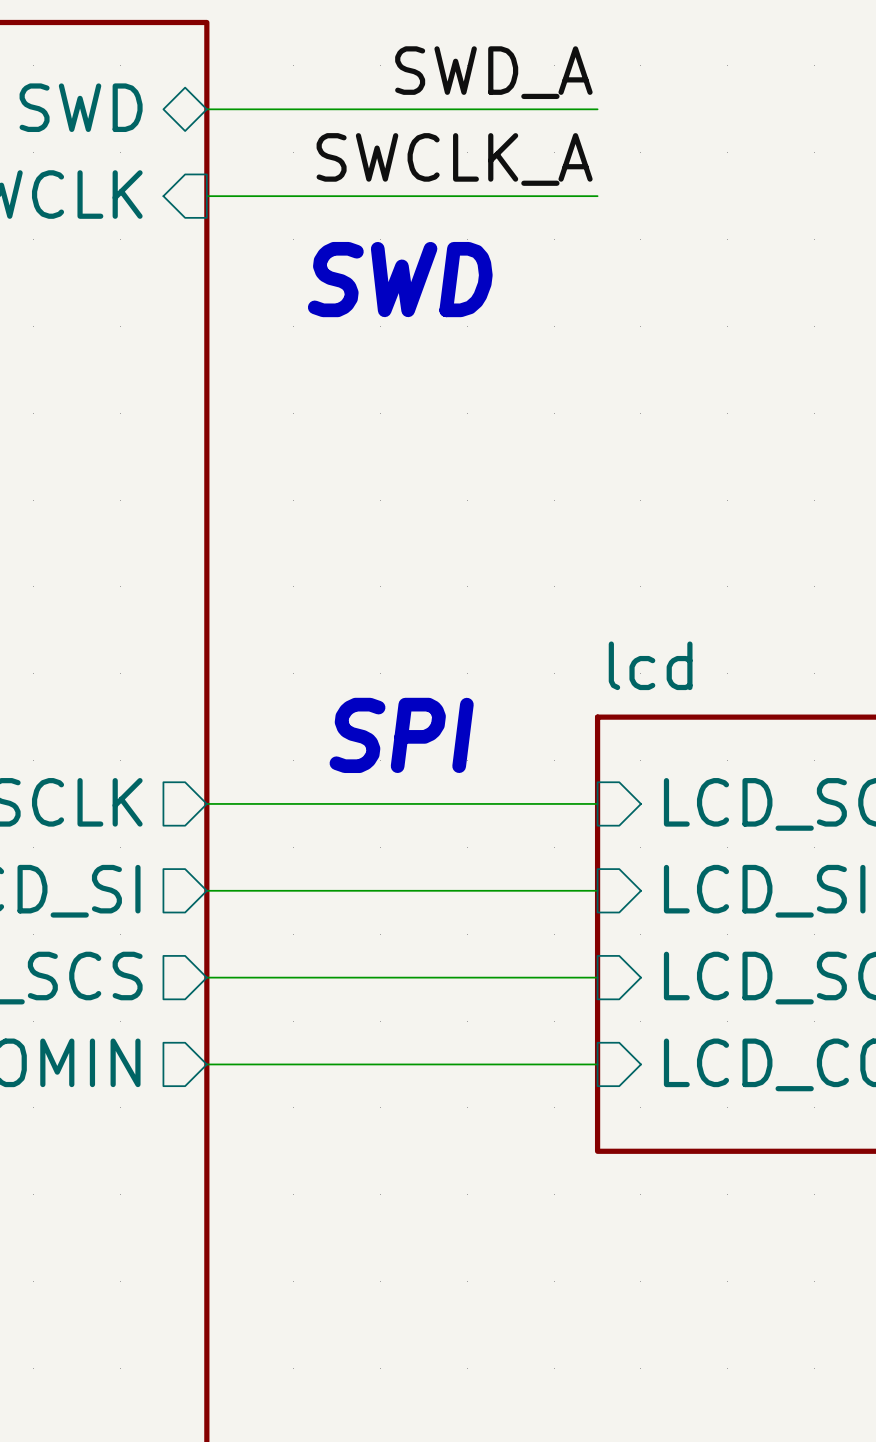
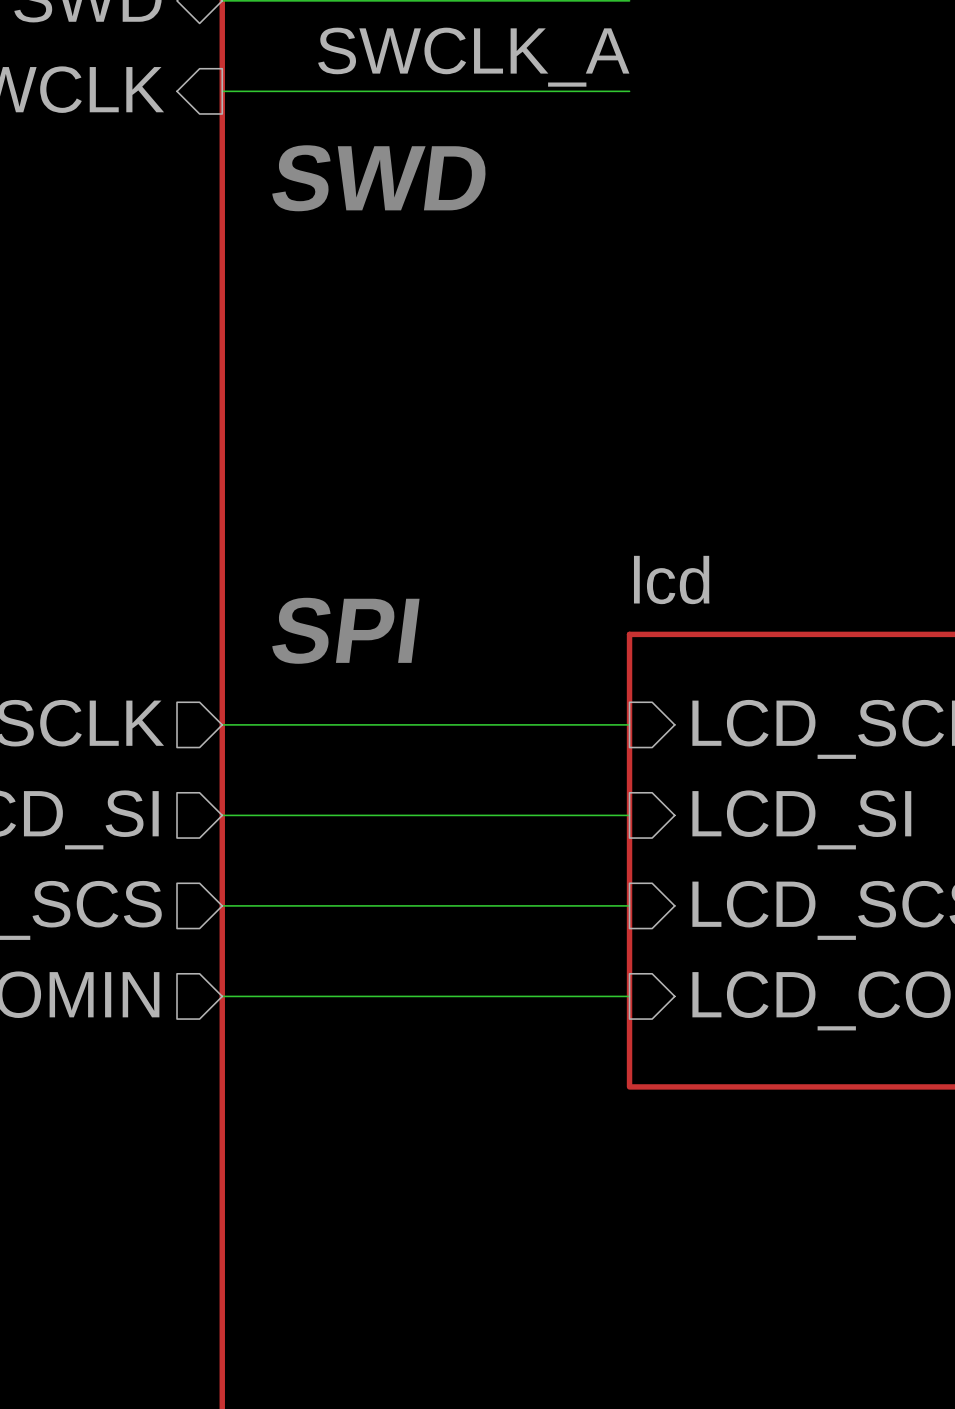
text position: SWD (400, 279) -> SWD (379, 178)
text position: SPI (401, 735) -> SPI (345, 630)

